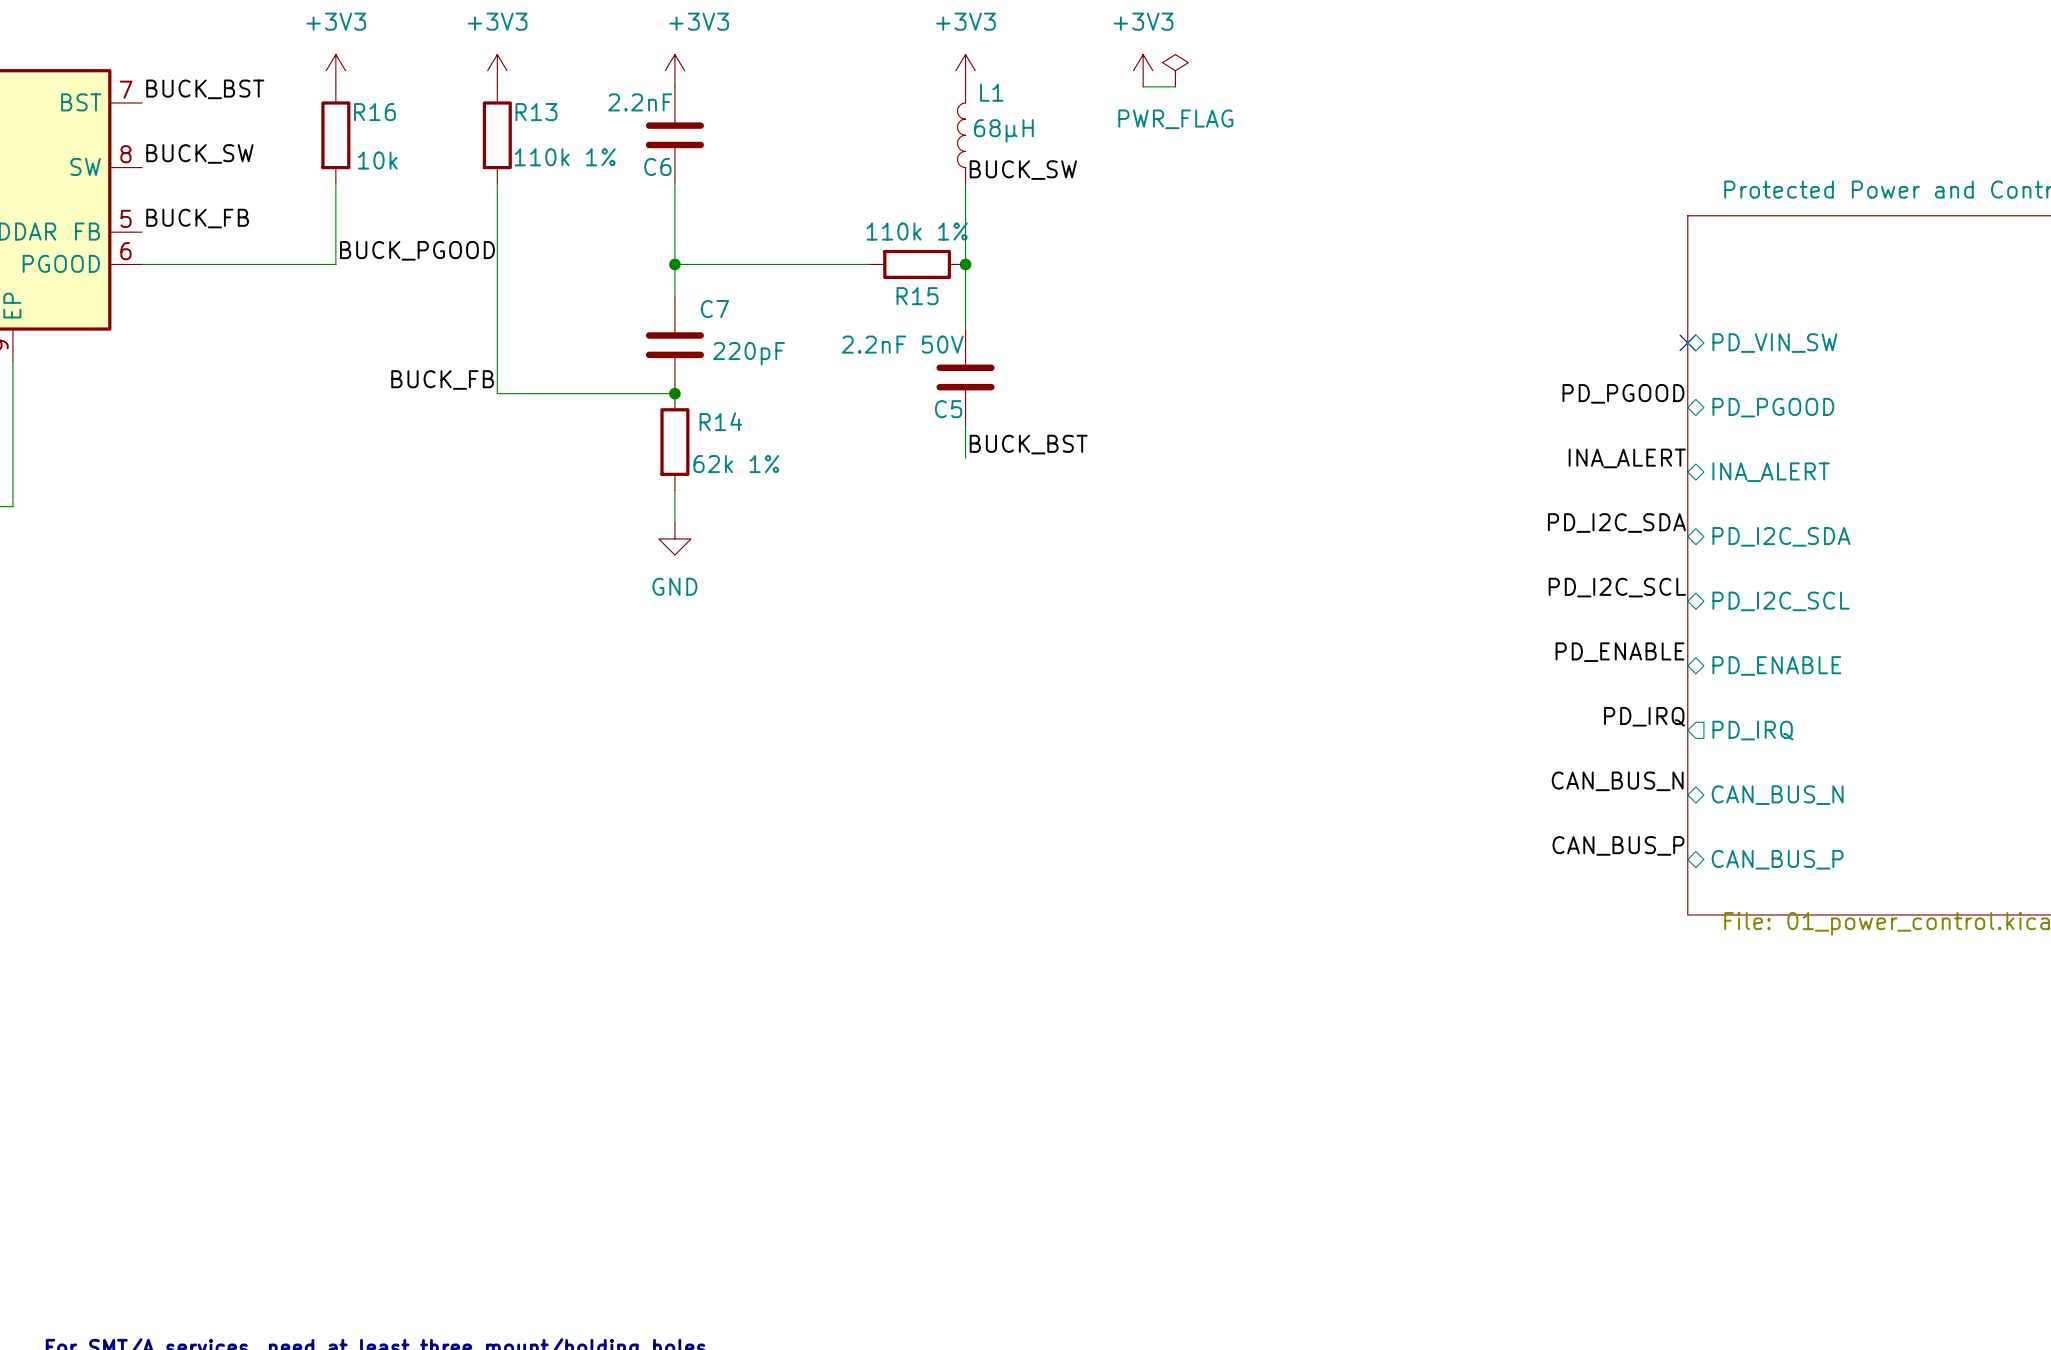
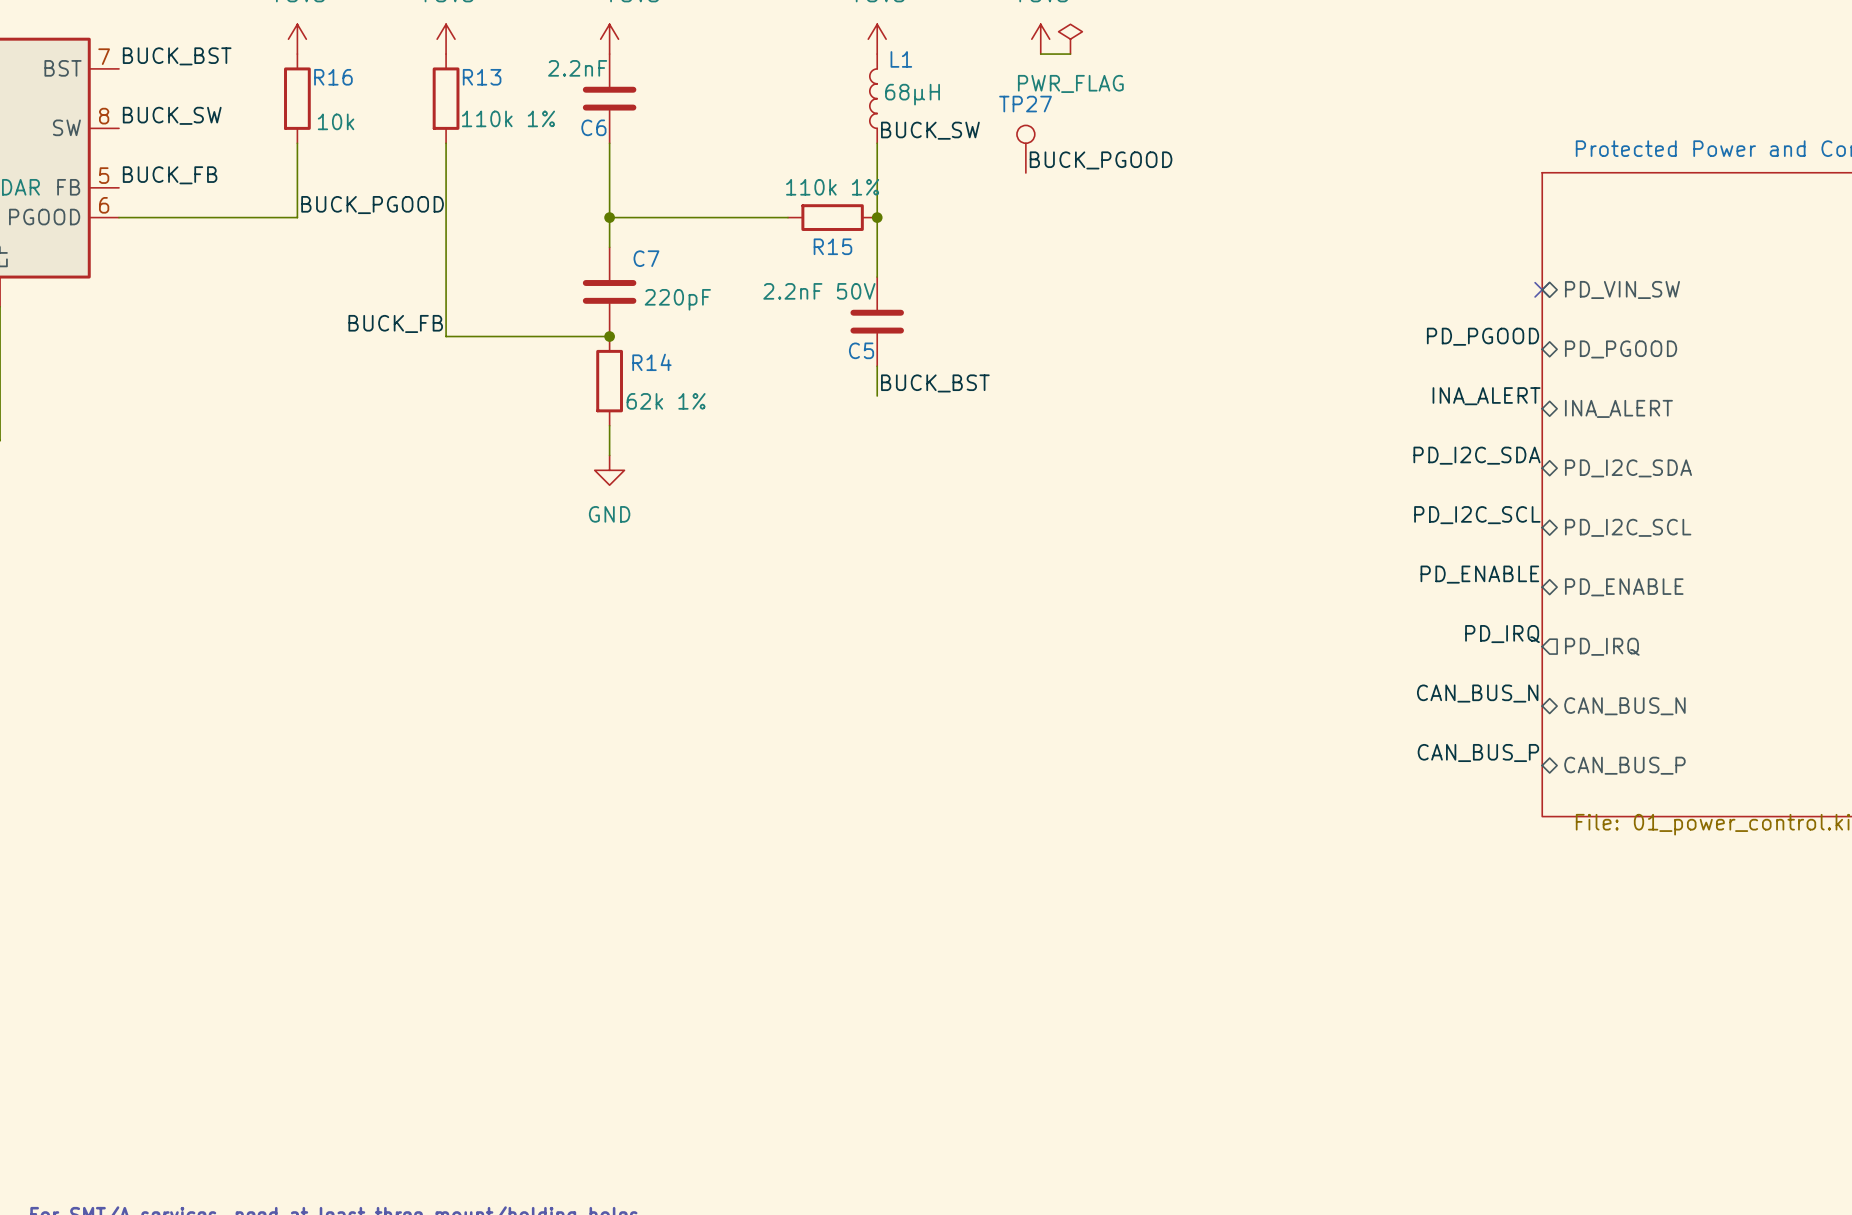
TP27: none -> (1025, 149)
label: none -> BUCK_PGOOD (1101, 160)

